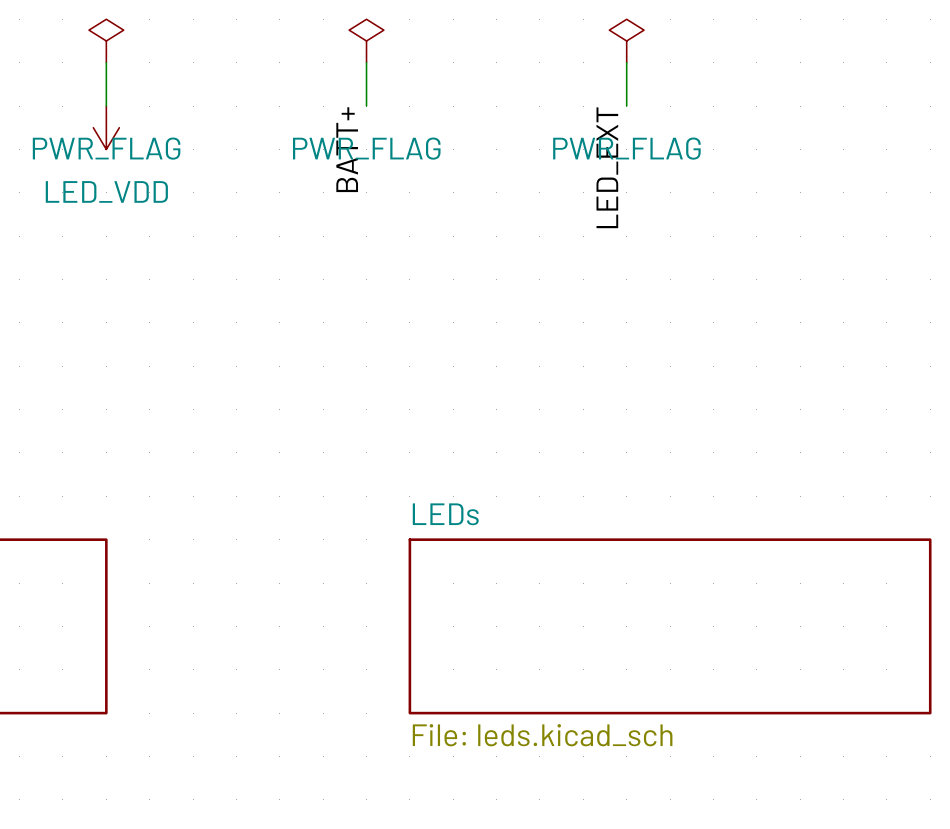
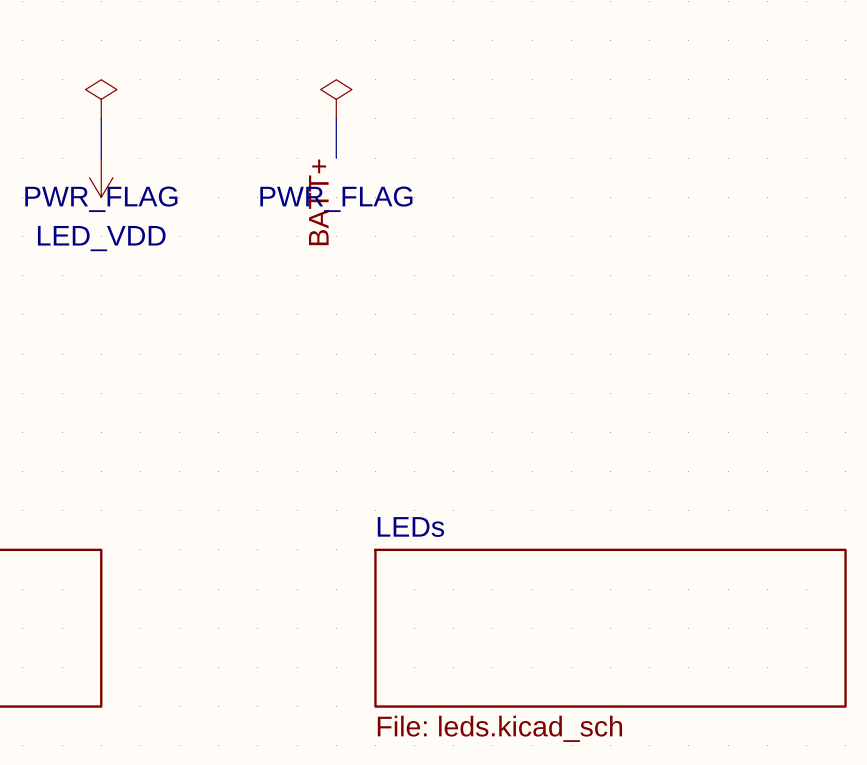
power symbol: PWR_FLAG (626, 40) -> none
wire: (626, 62) (626, 106) -> none
label: LED_EXT (607, 167) -> none

